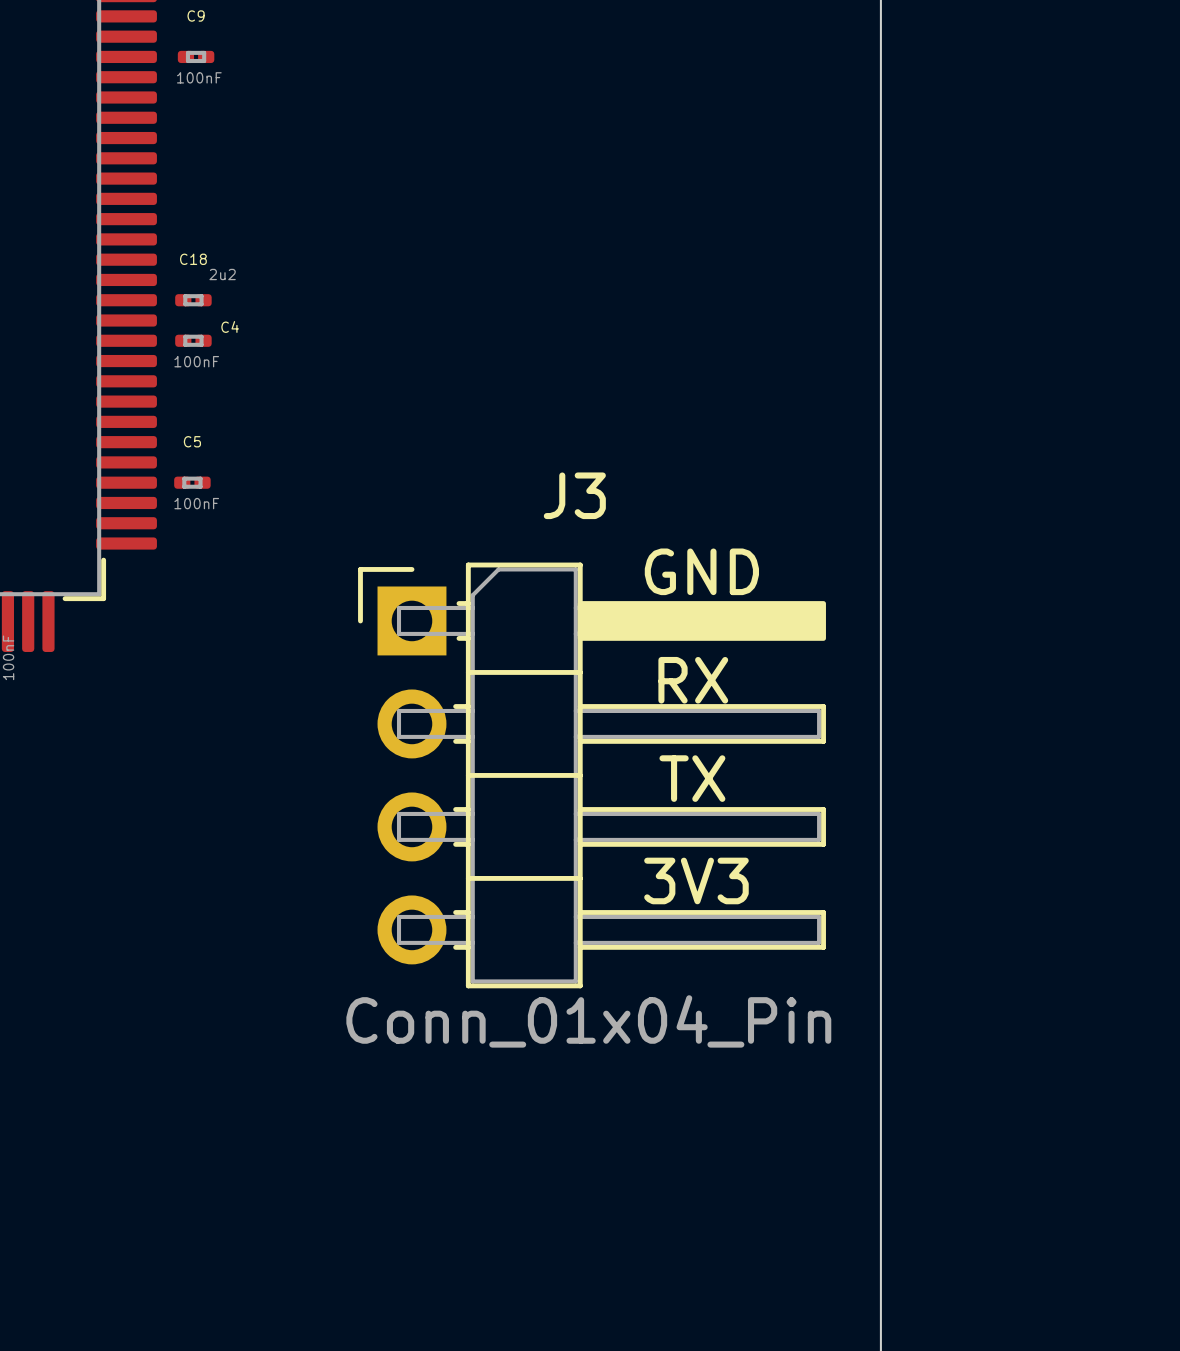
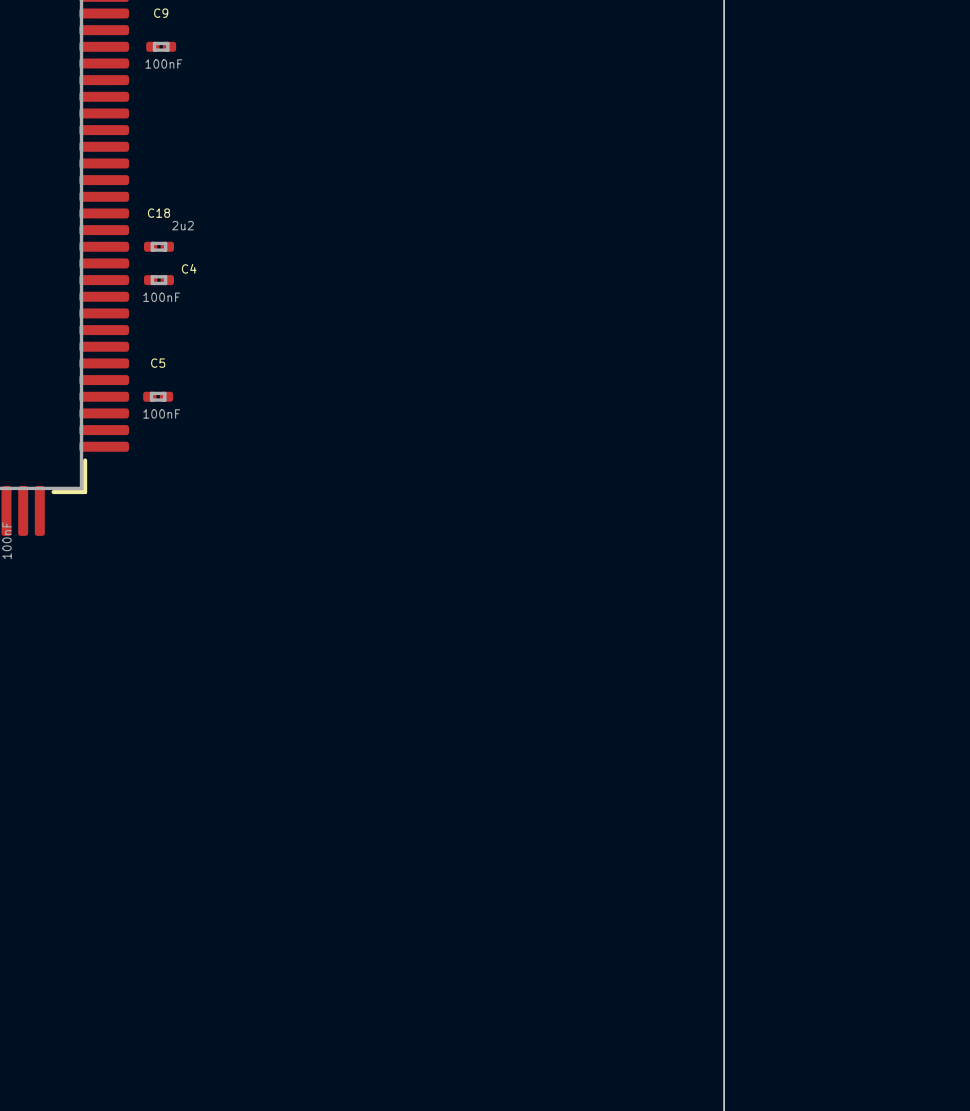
text: GND (701, 571) -> none
text: RX (693, 680) -> none
J3: Conn_01x04_Pin (592, 775) -> none
text: TX (692, 778) -> none
text: 3V3 (696, 880) -> none

